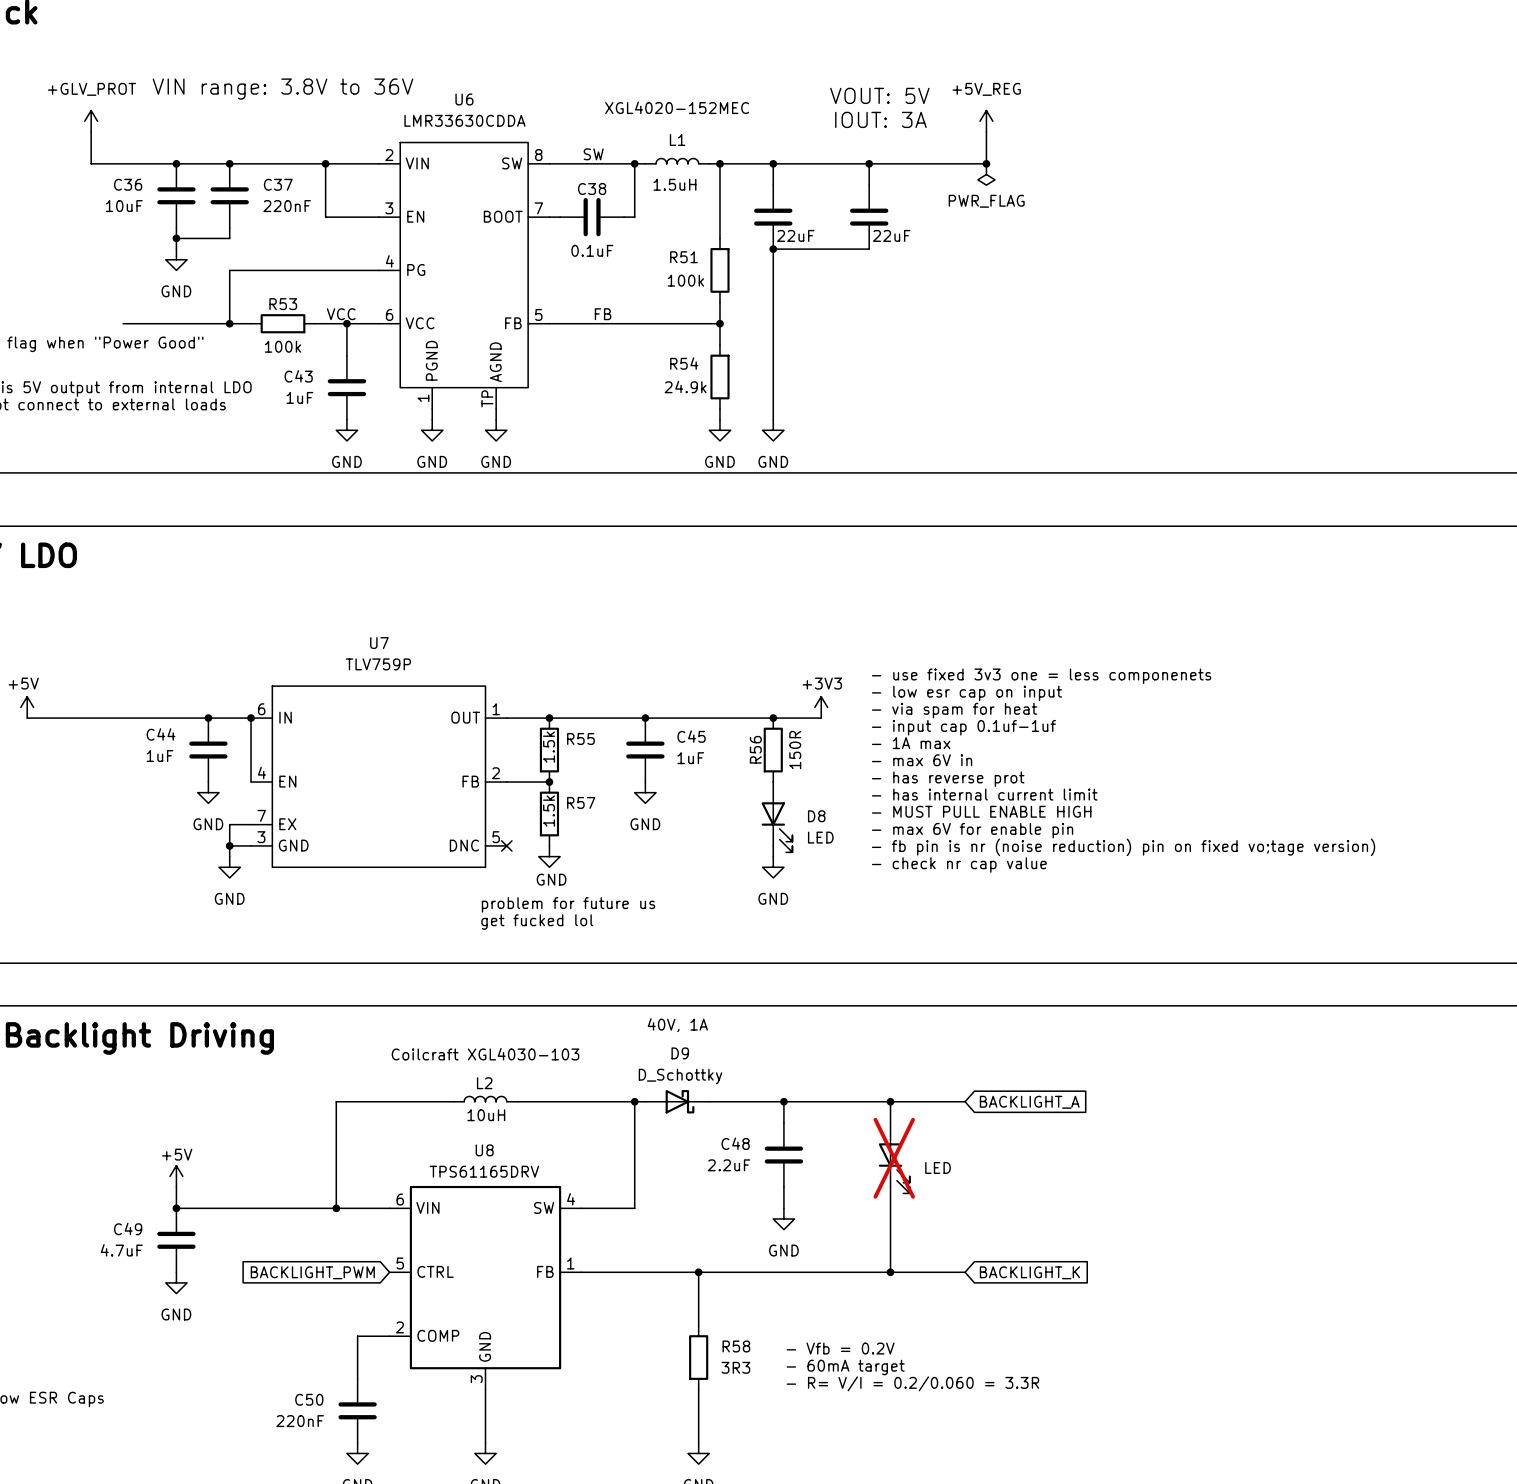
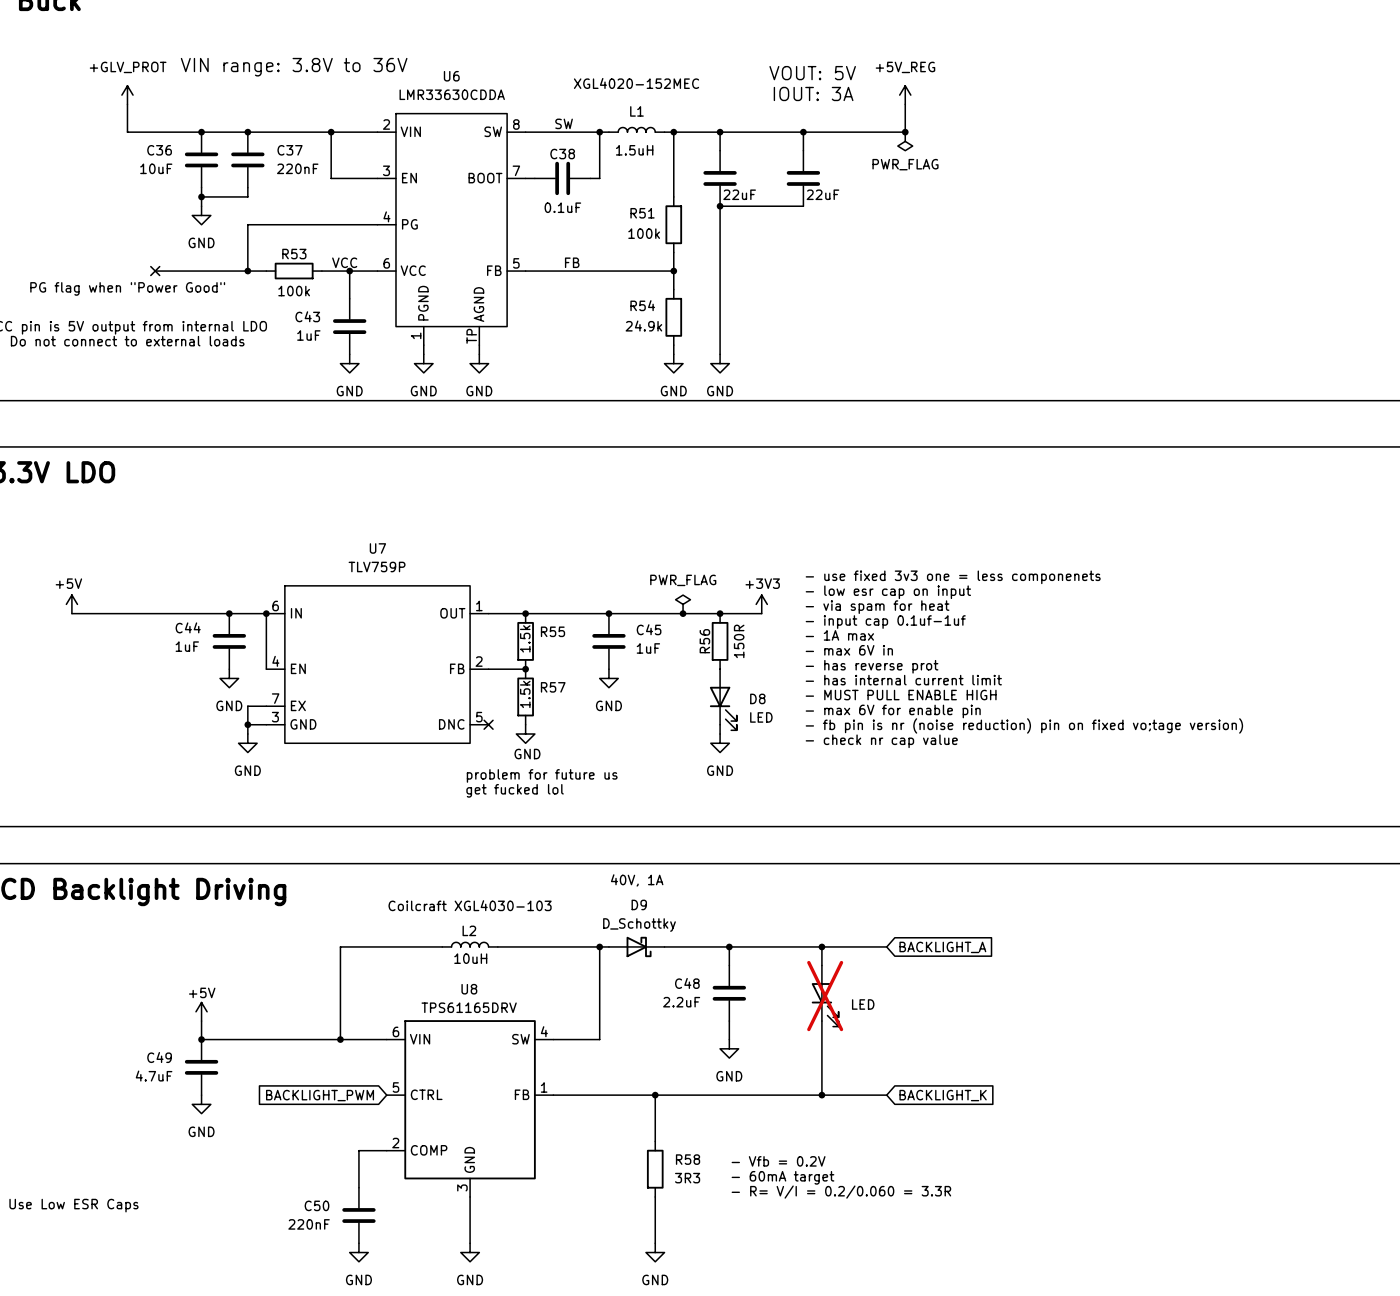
no-connect mark: none -> (155, 271)
power symbol: none -> PWR_FLAG (683, 604)
junction: none -> (683, 613)

